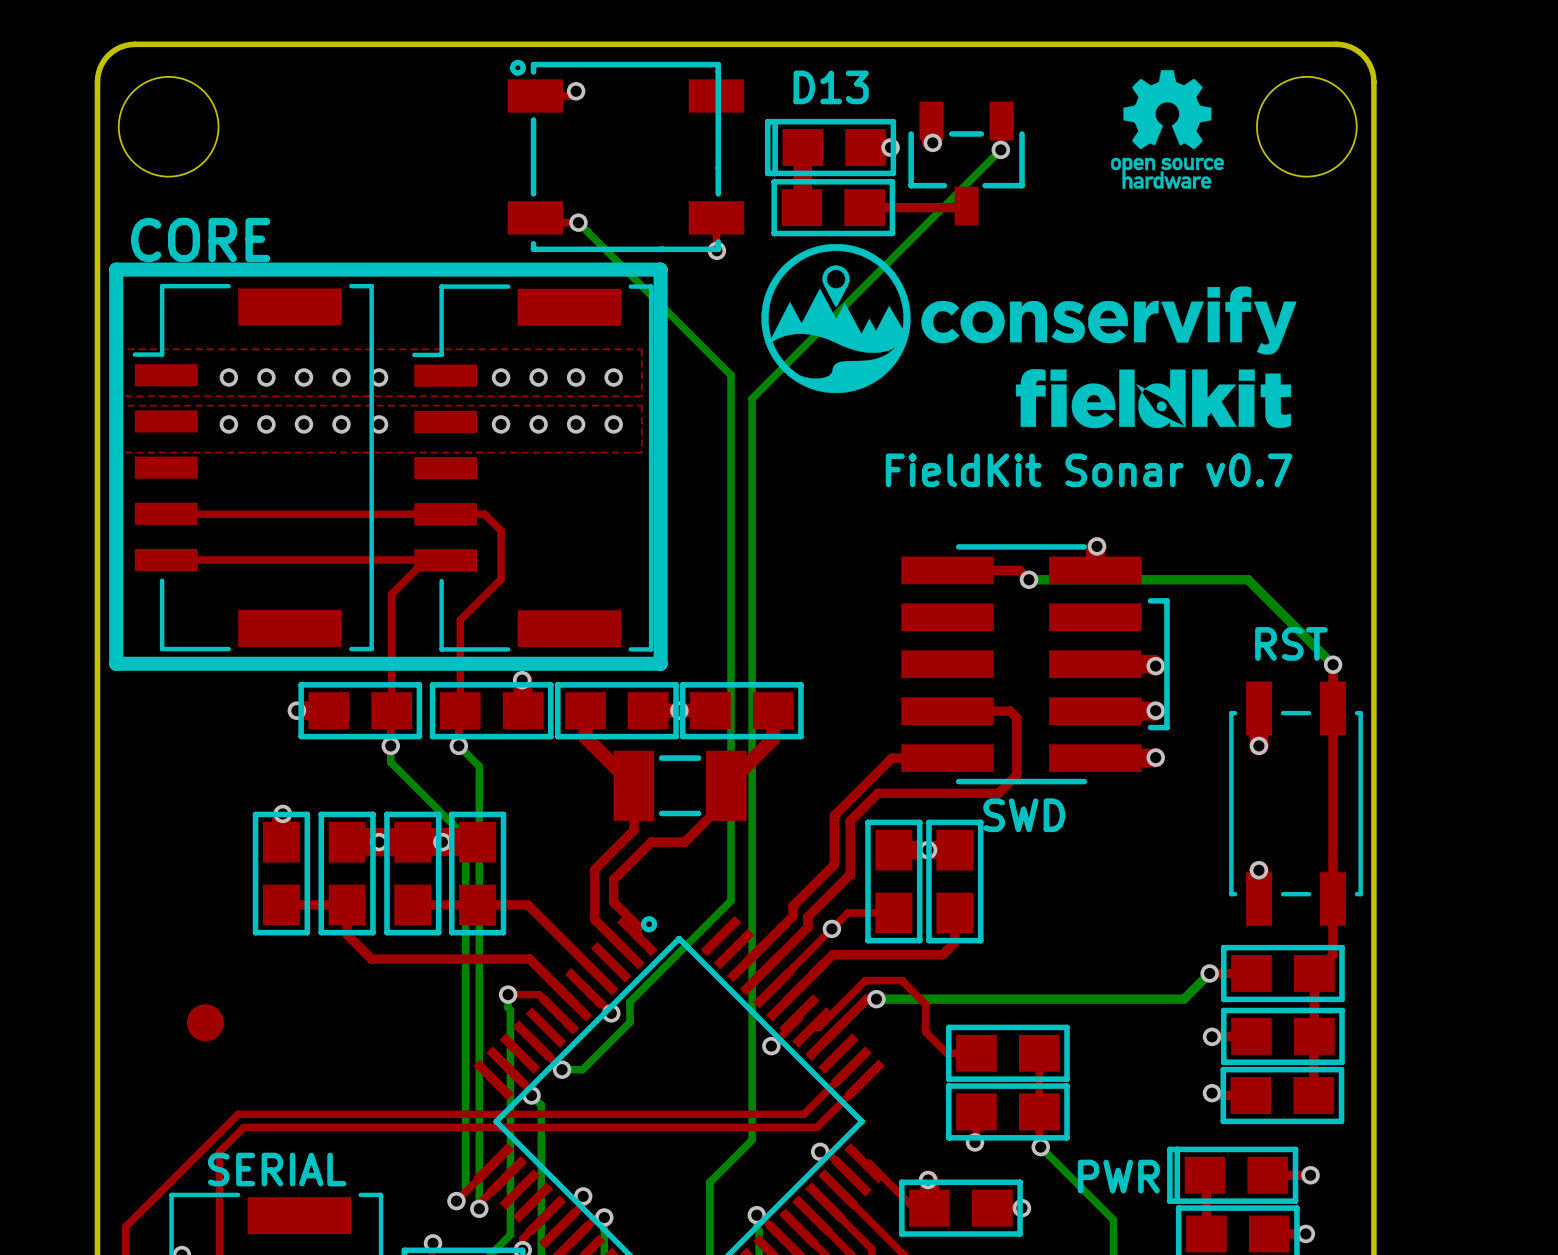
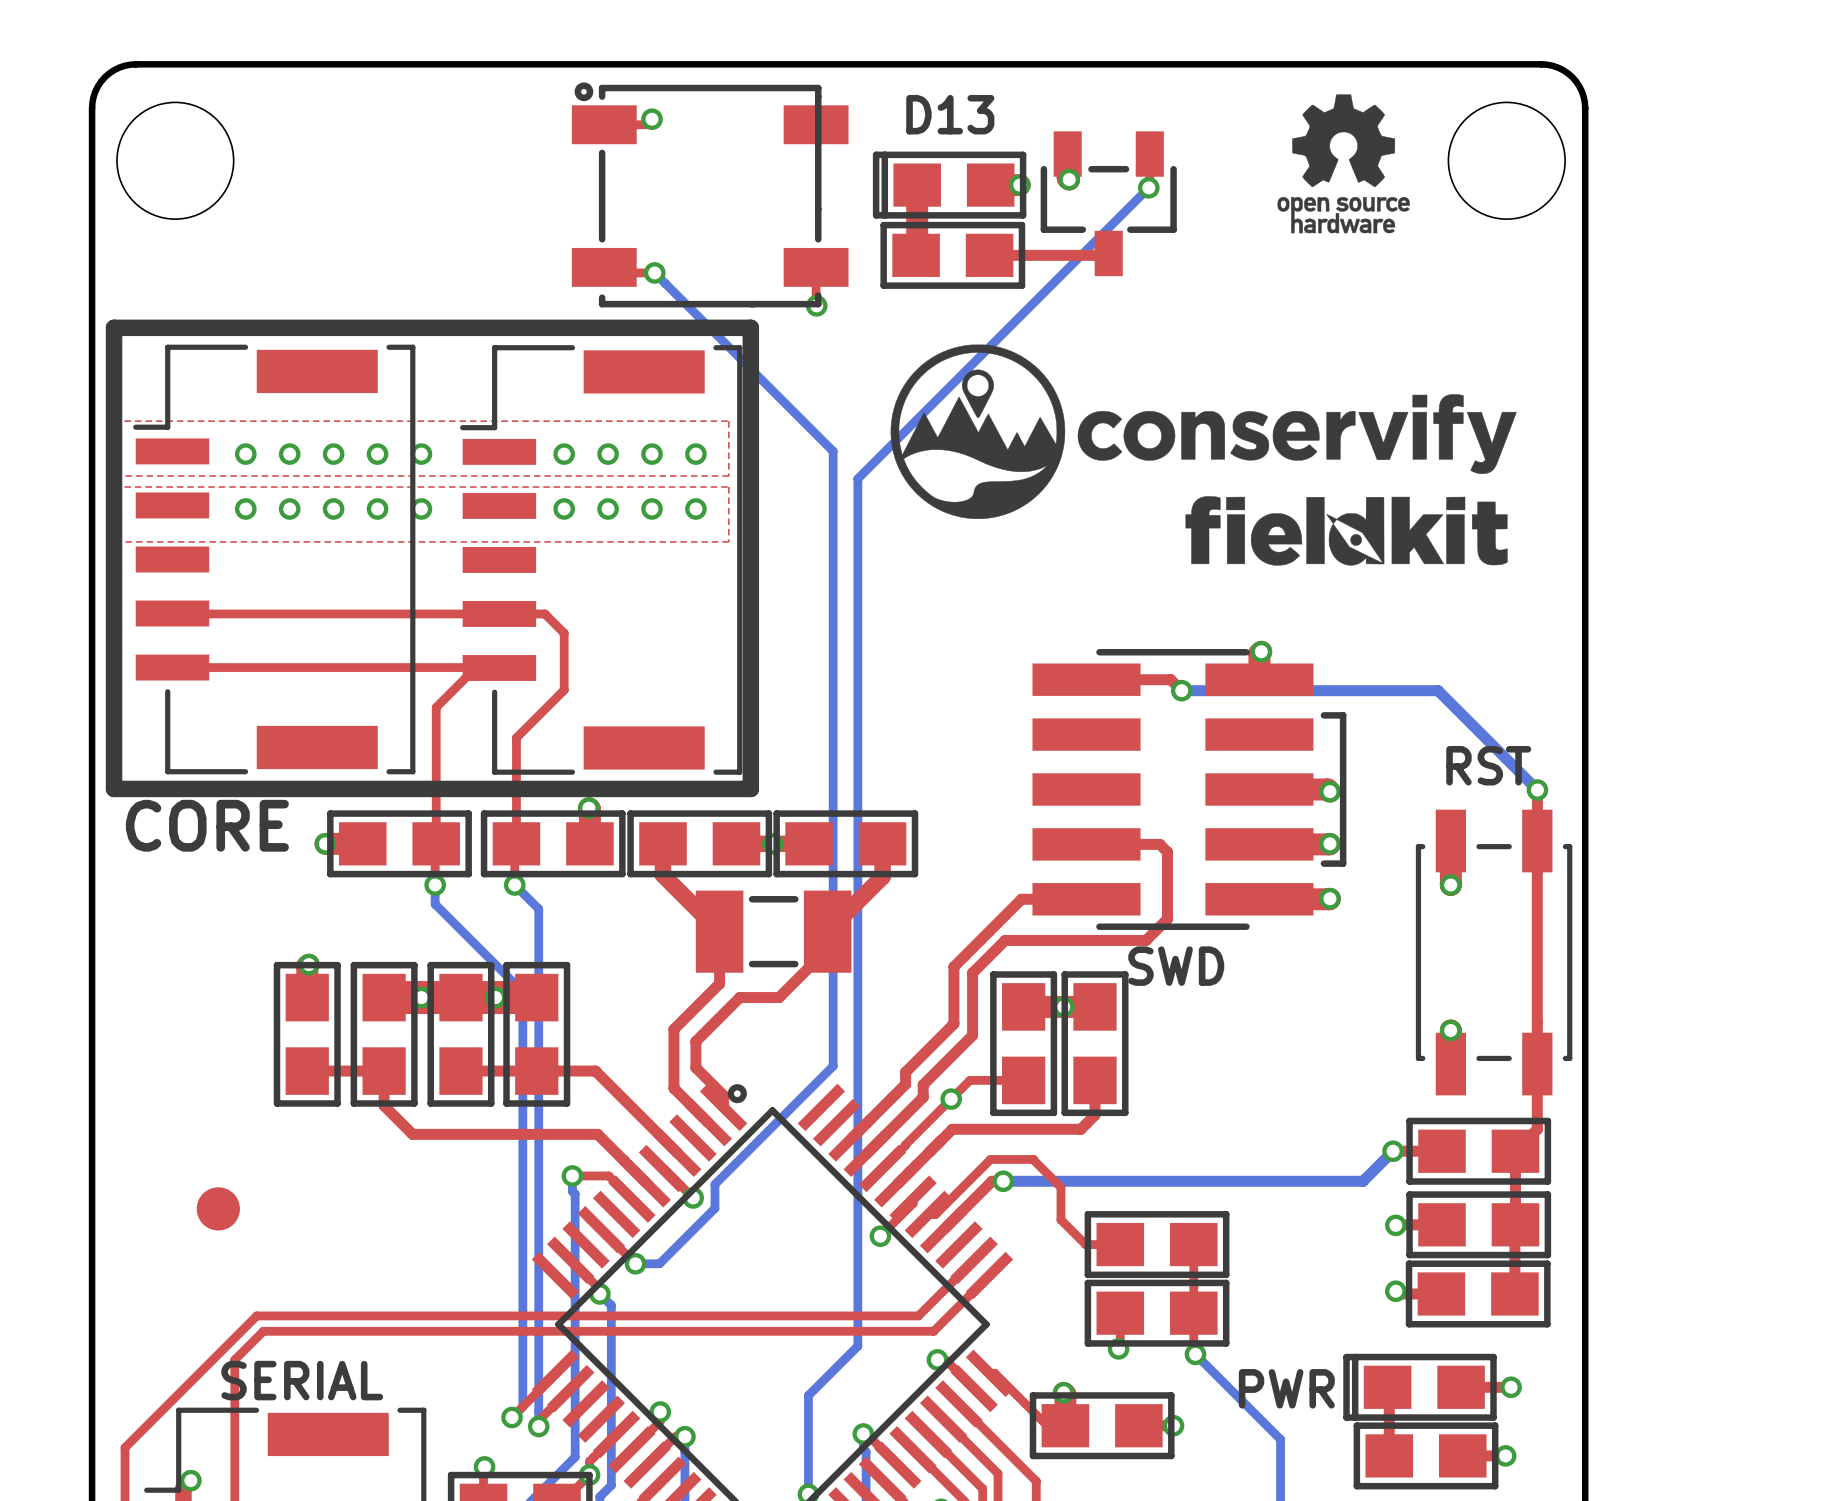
text position: CORE (200, 240) -> CORE (207, 825)
drawing position: (1028, 318) -> (1203, 431)
drawing position: (1153, 398) -> (1346, 530)
text: FieldKit Sonar v0.7 (1088, 470) -> none

